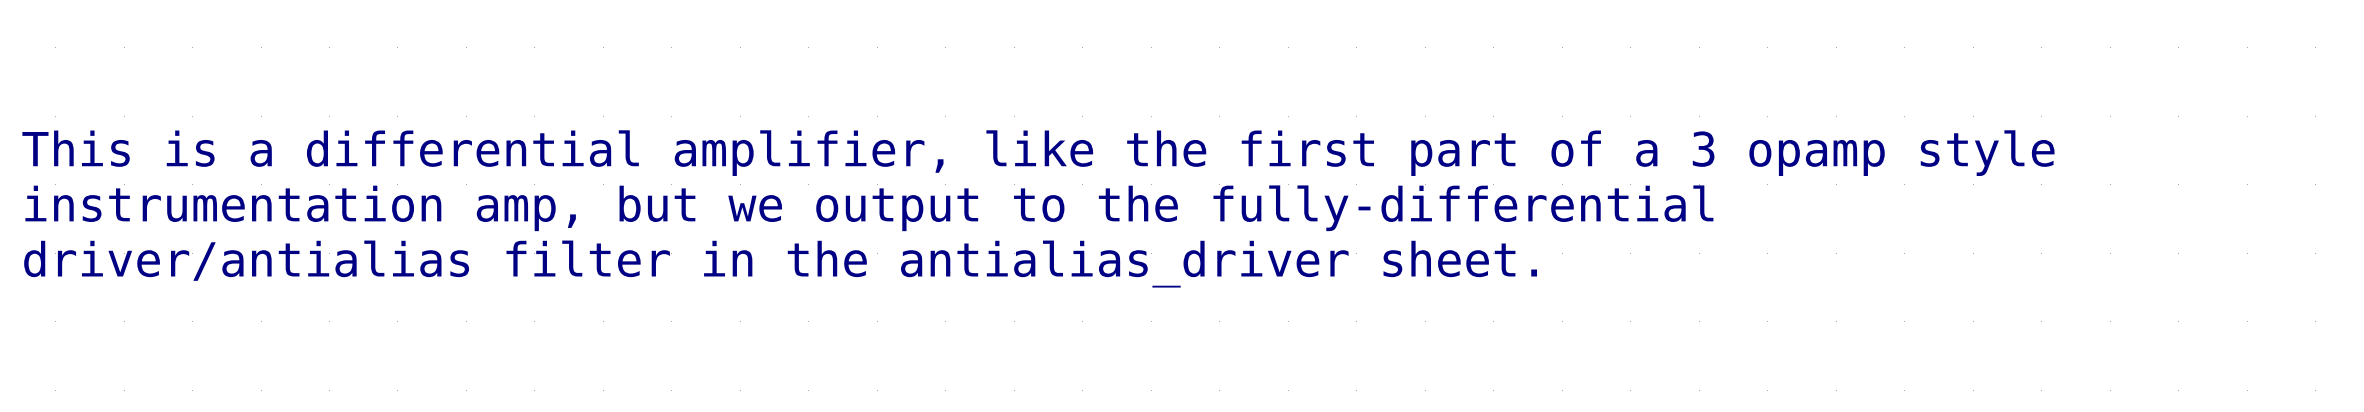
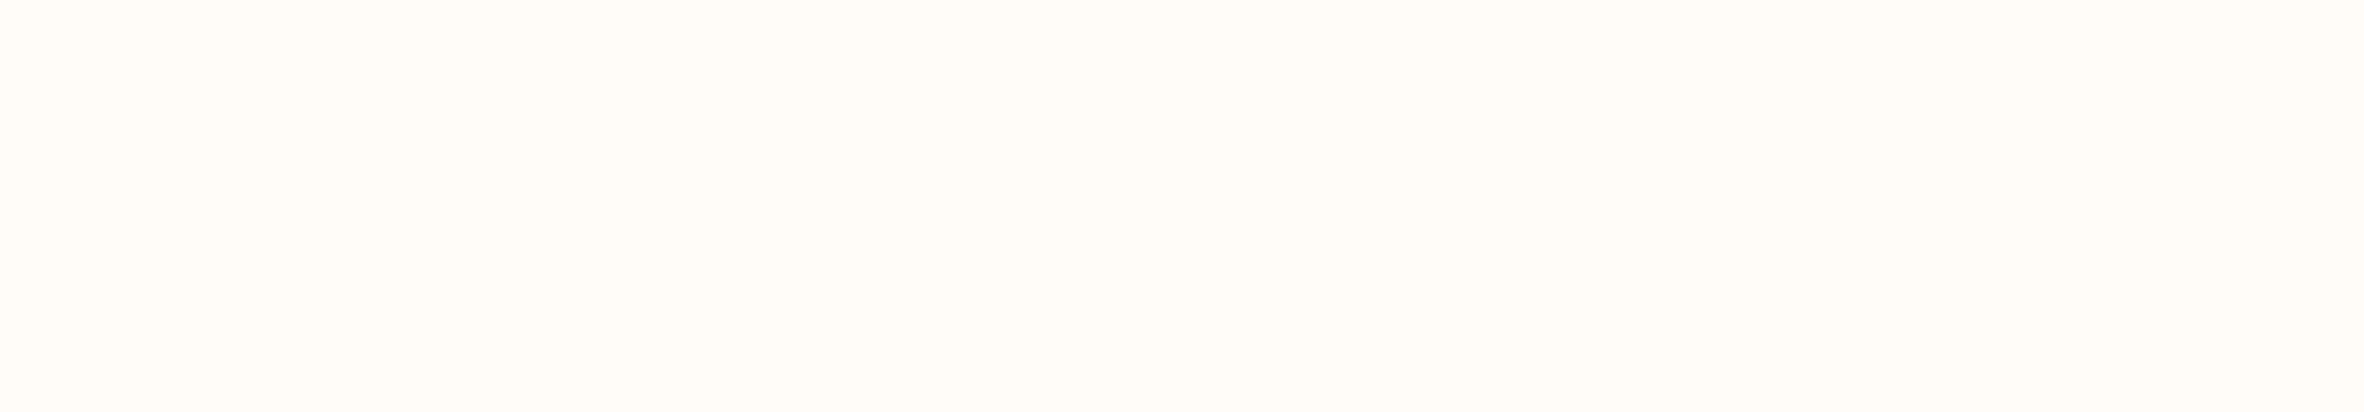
text: This is a differential amplifier, like the first part of a 3 opamp style (1038, 153) -> none
text: instrumentation amp, but we output to the fully-differential (869, 208) -> none
text: driver/antialias filter in the antialias_driver sheet. (780, 264) -> none

